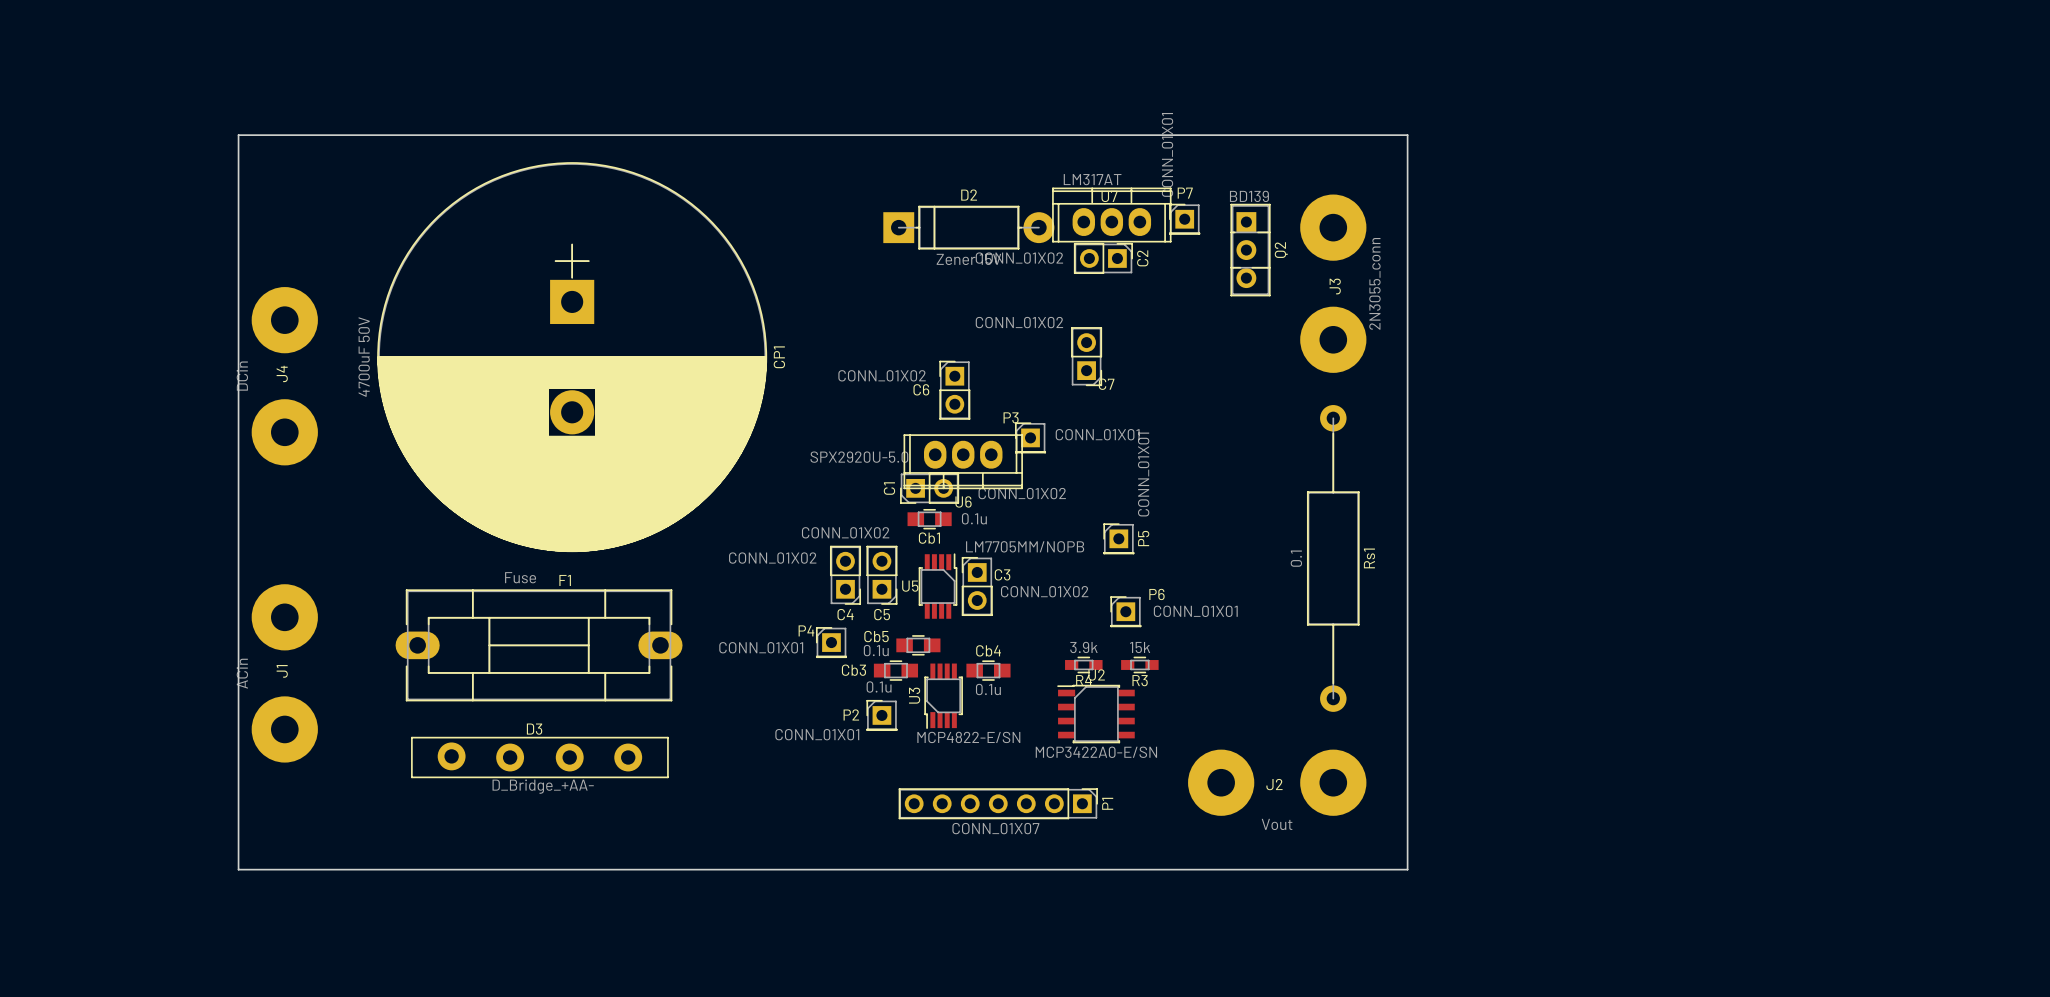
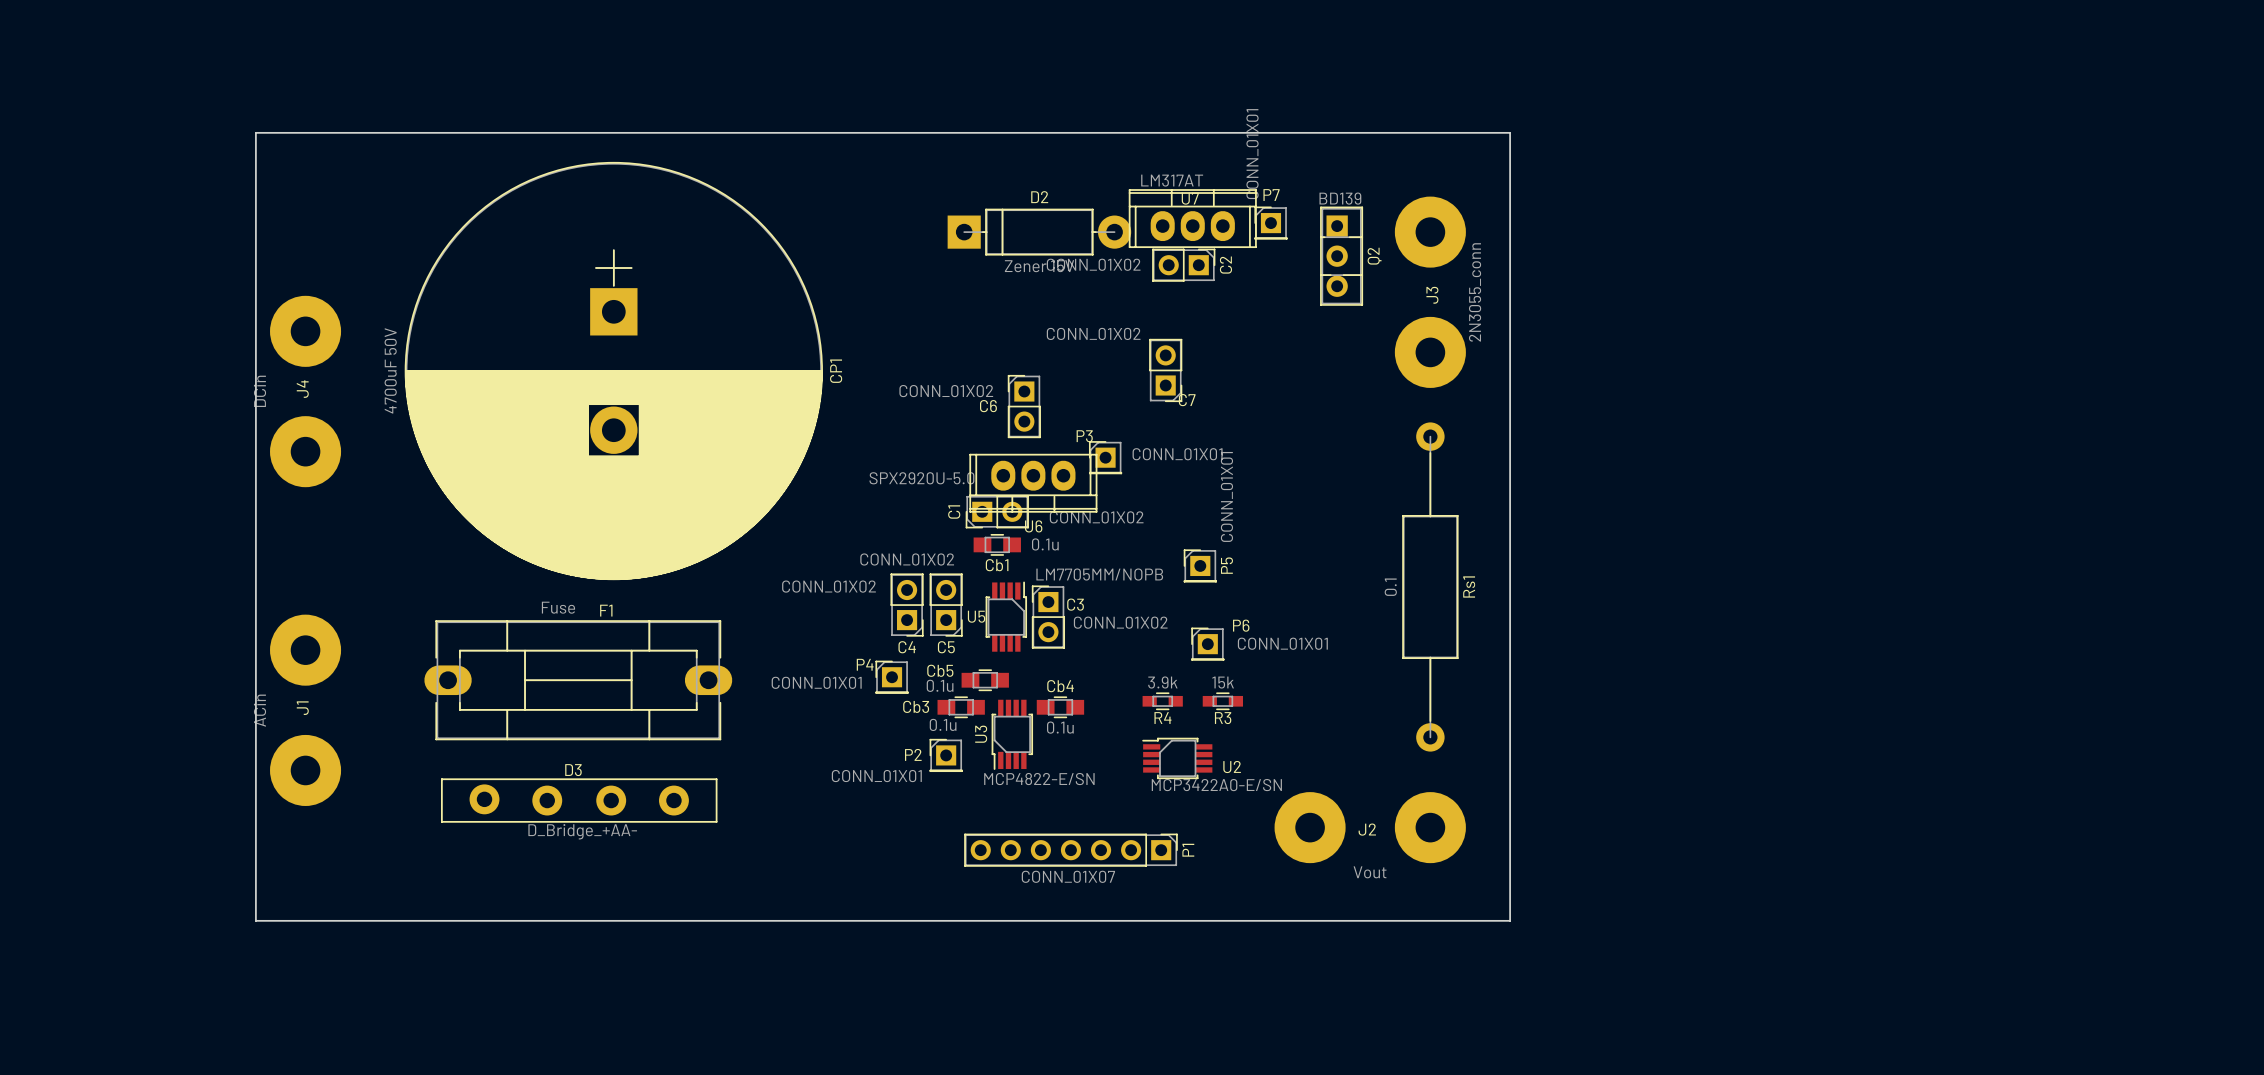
U2 name position: U2 (1096, 675) -> U2 (1232, 767)
U2 footprint: [1057, 684, 1135, 744] -> [1142, 737, 1213, 780]
U2 value position: MCP3422A0-E/SN (1096, 752) -> MCP3422A0-E/SN (1216, 785)

